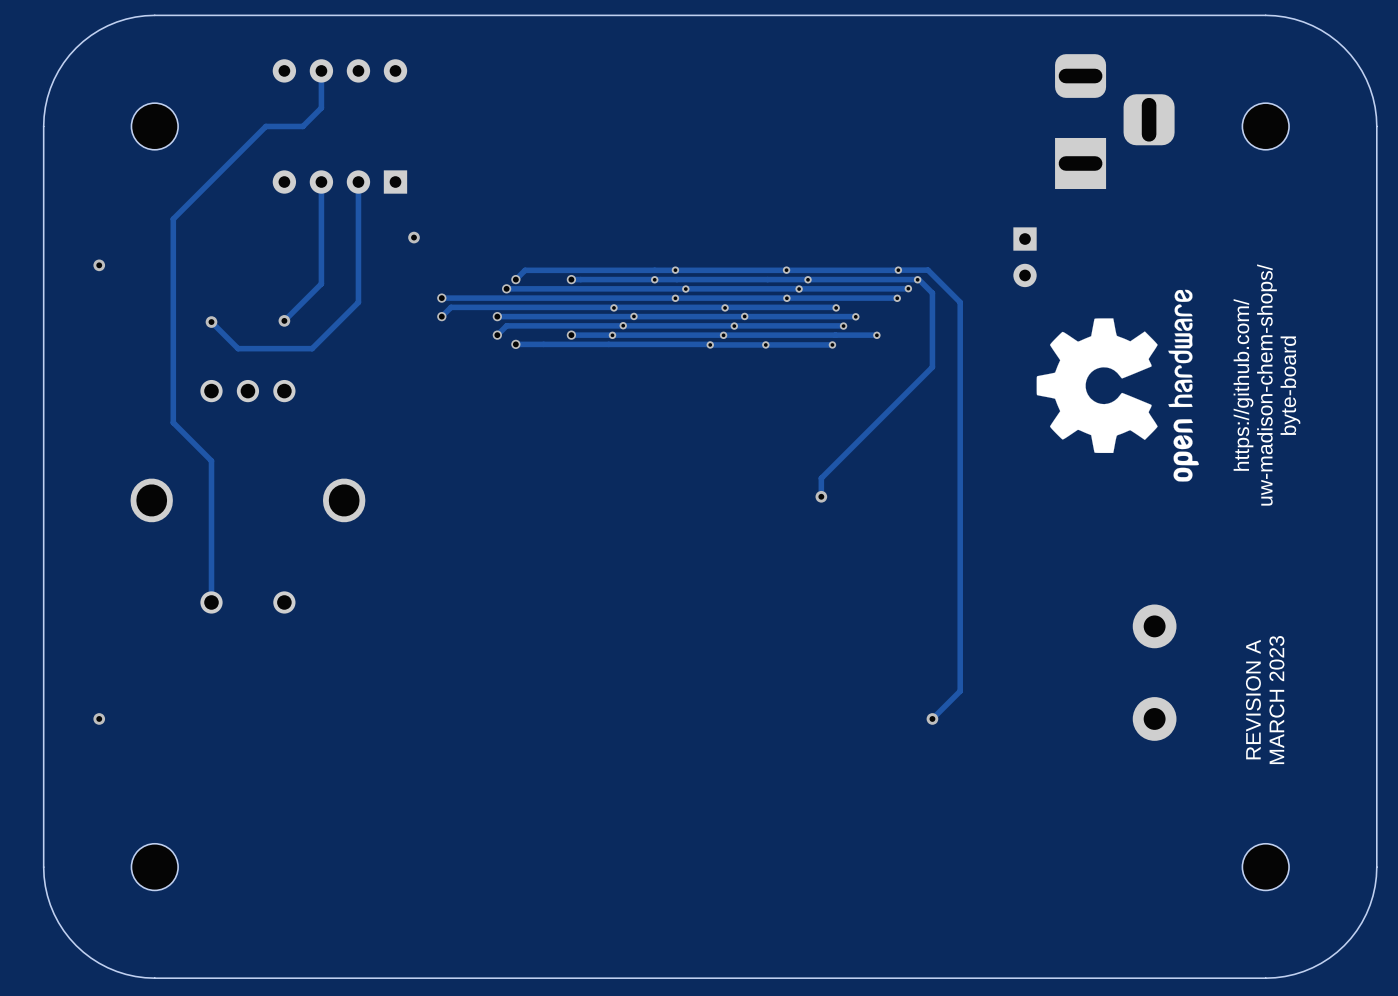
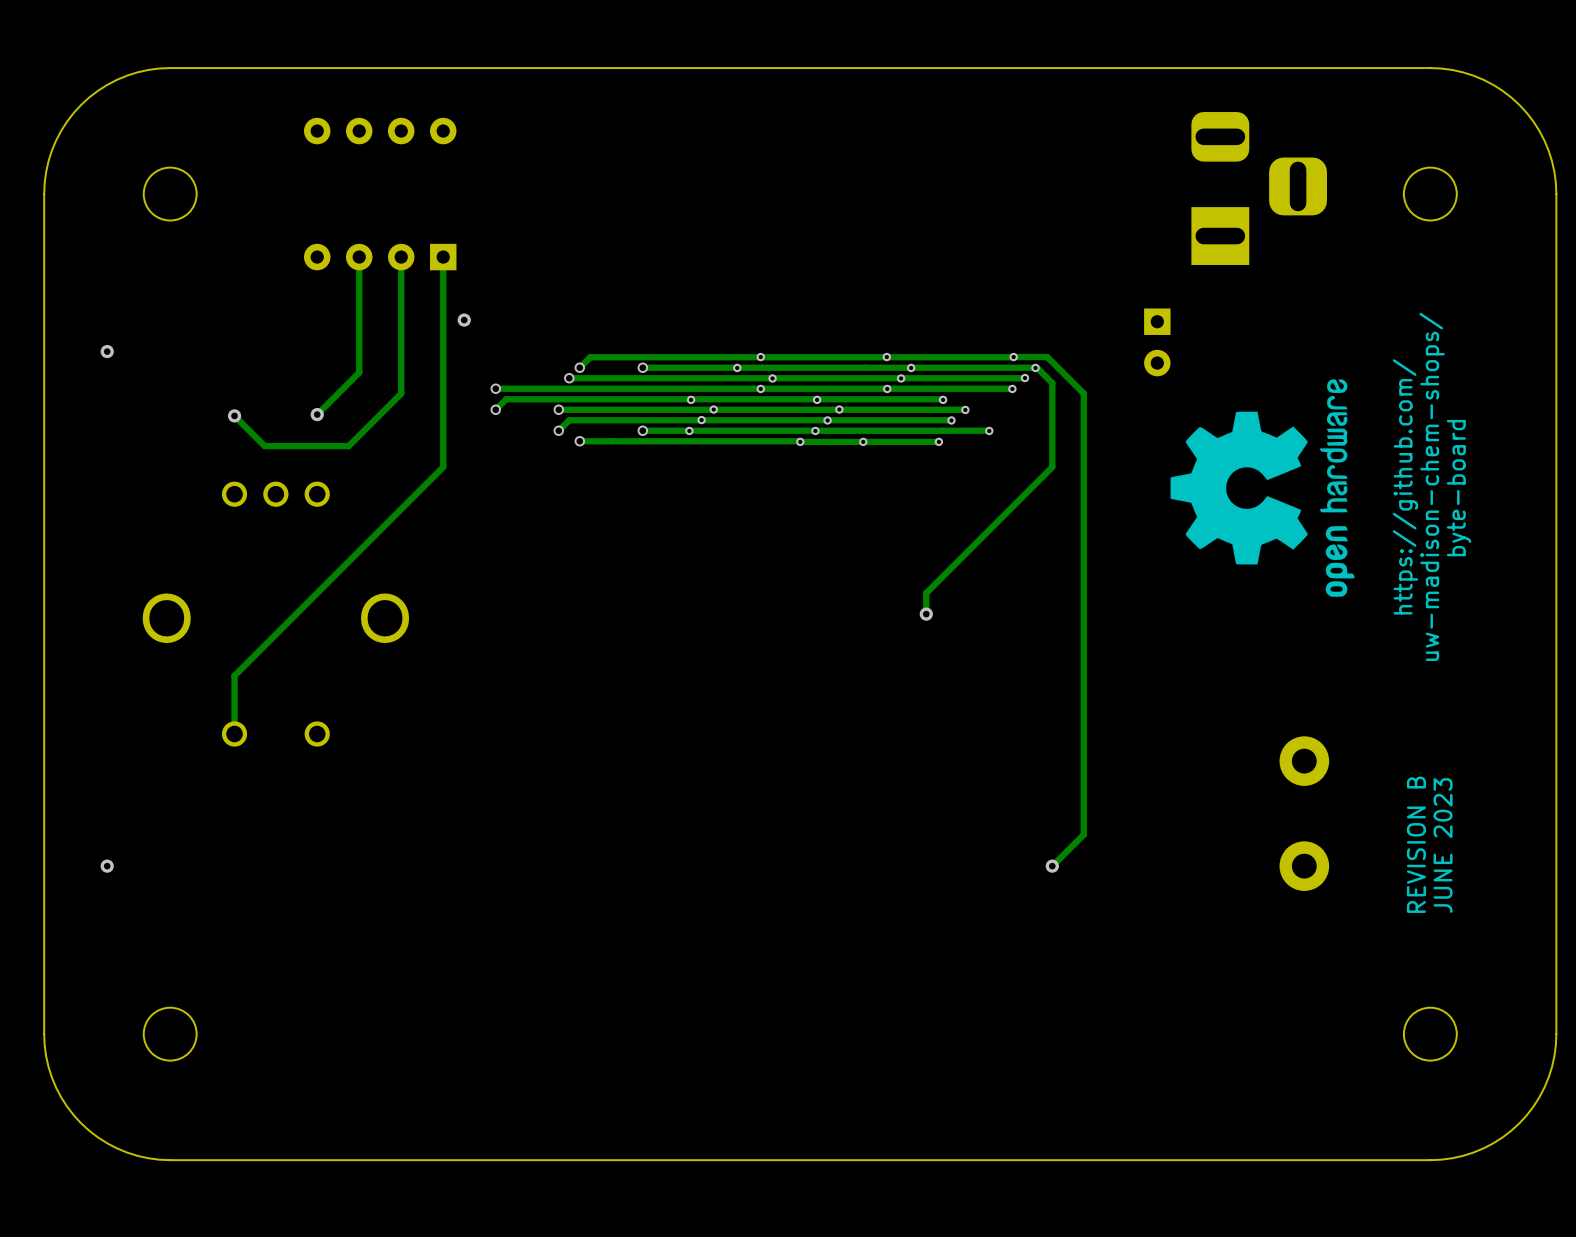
track: (321, 70) (321, 107) (302, 126) (265, 126) (173, 219) (173, 422) (211, 460) (211, 551) -> (443, 257) (443, 467) (234, 675)
text: REVISION A (1253, 699) -> REVISION B (1416, 844)
text: MARCH 2023 (1276, 700) -> JUNE 2023 (1443, 845)

